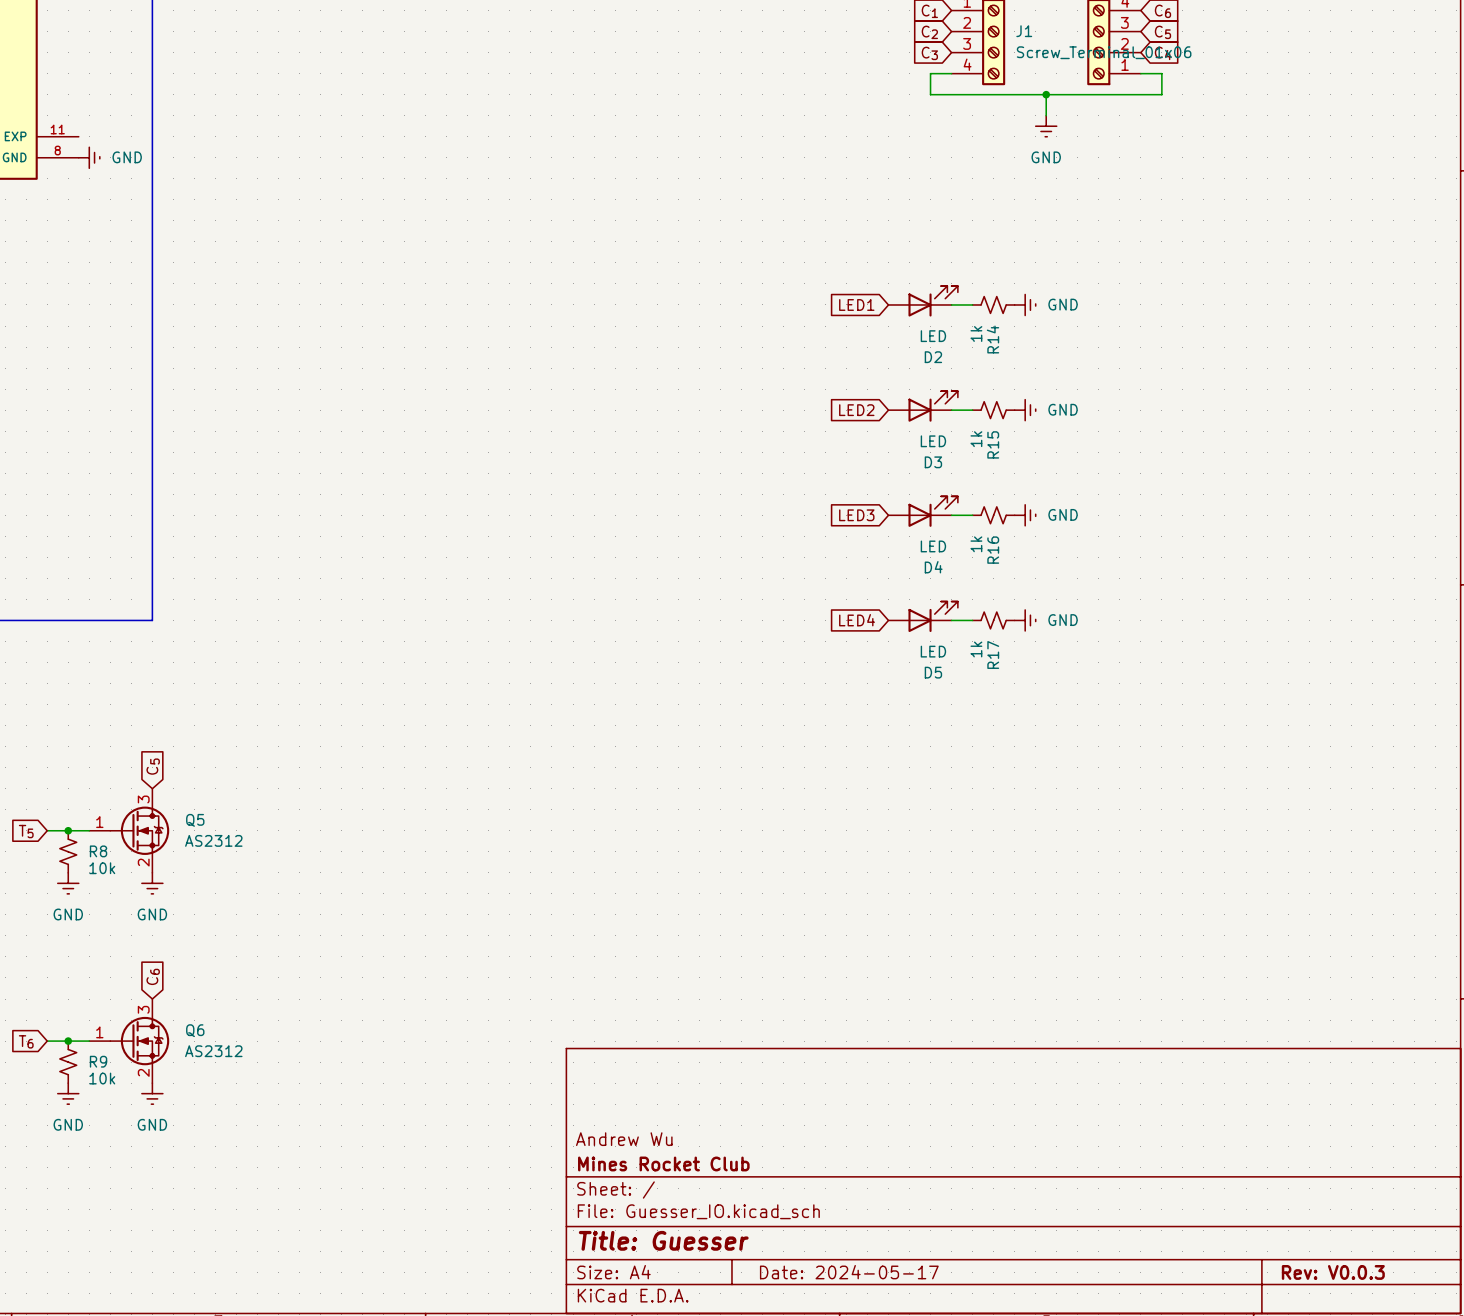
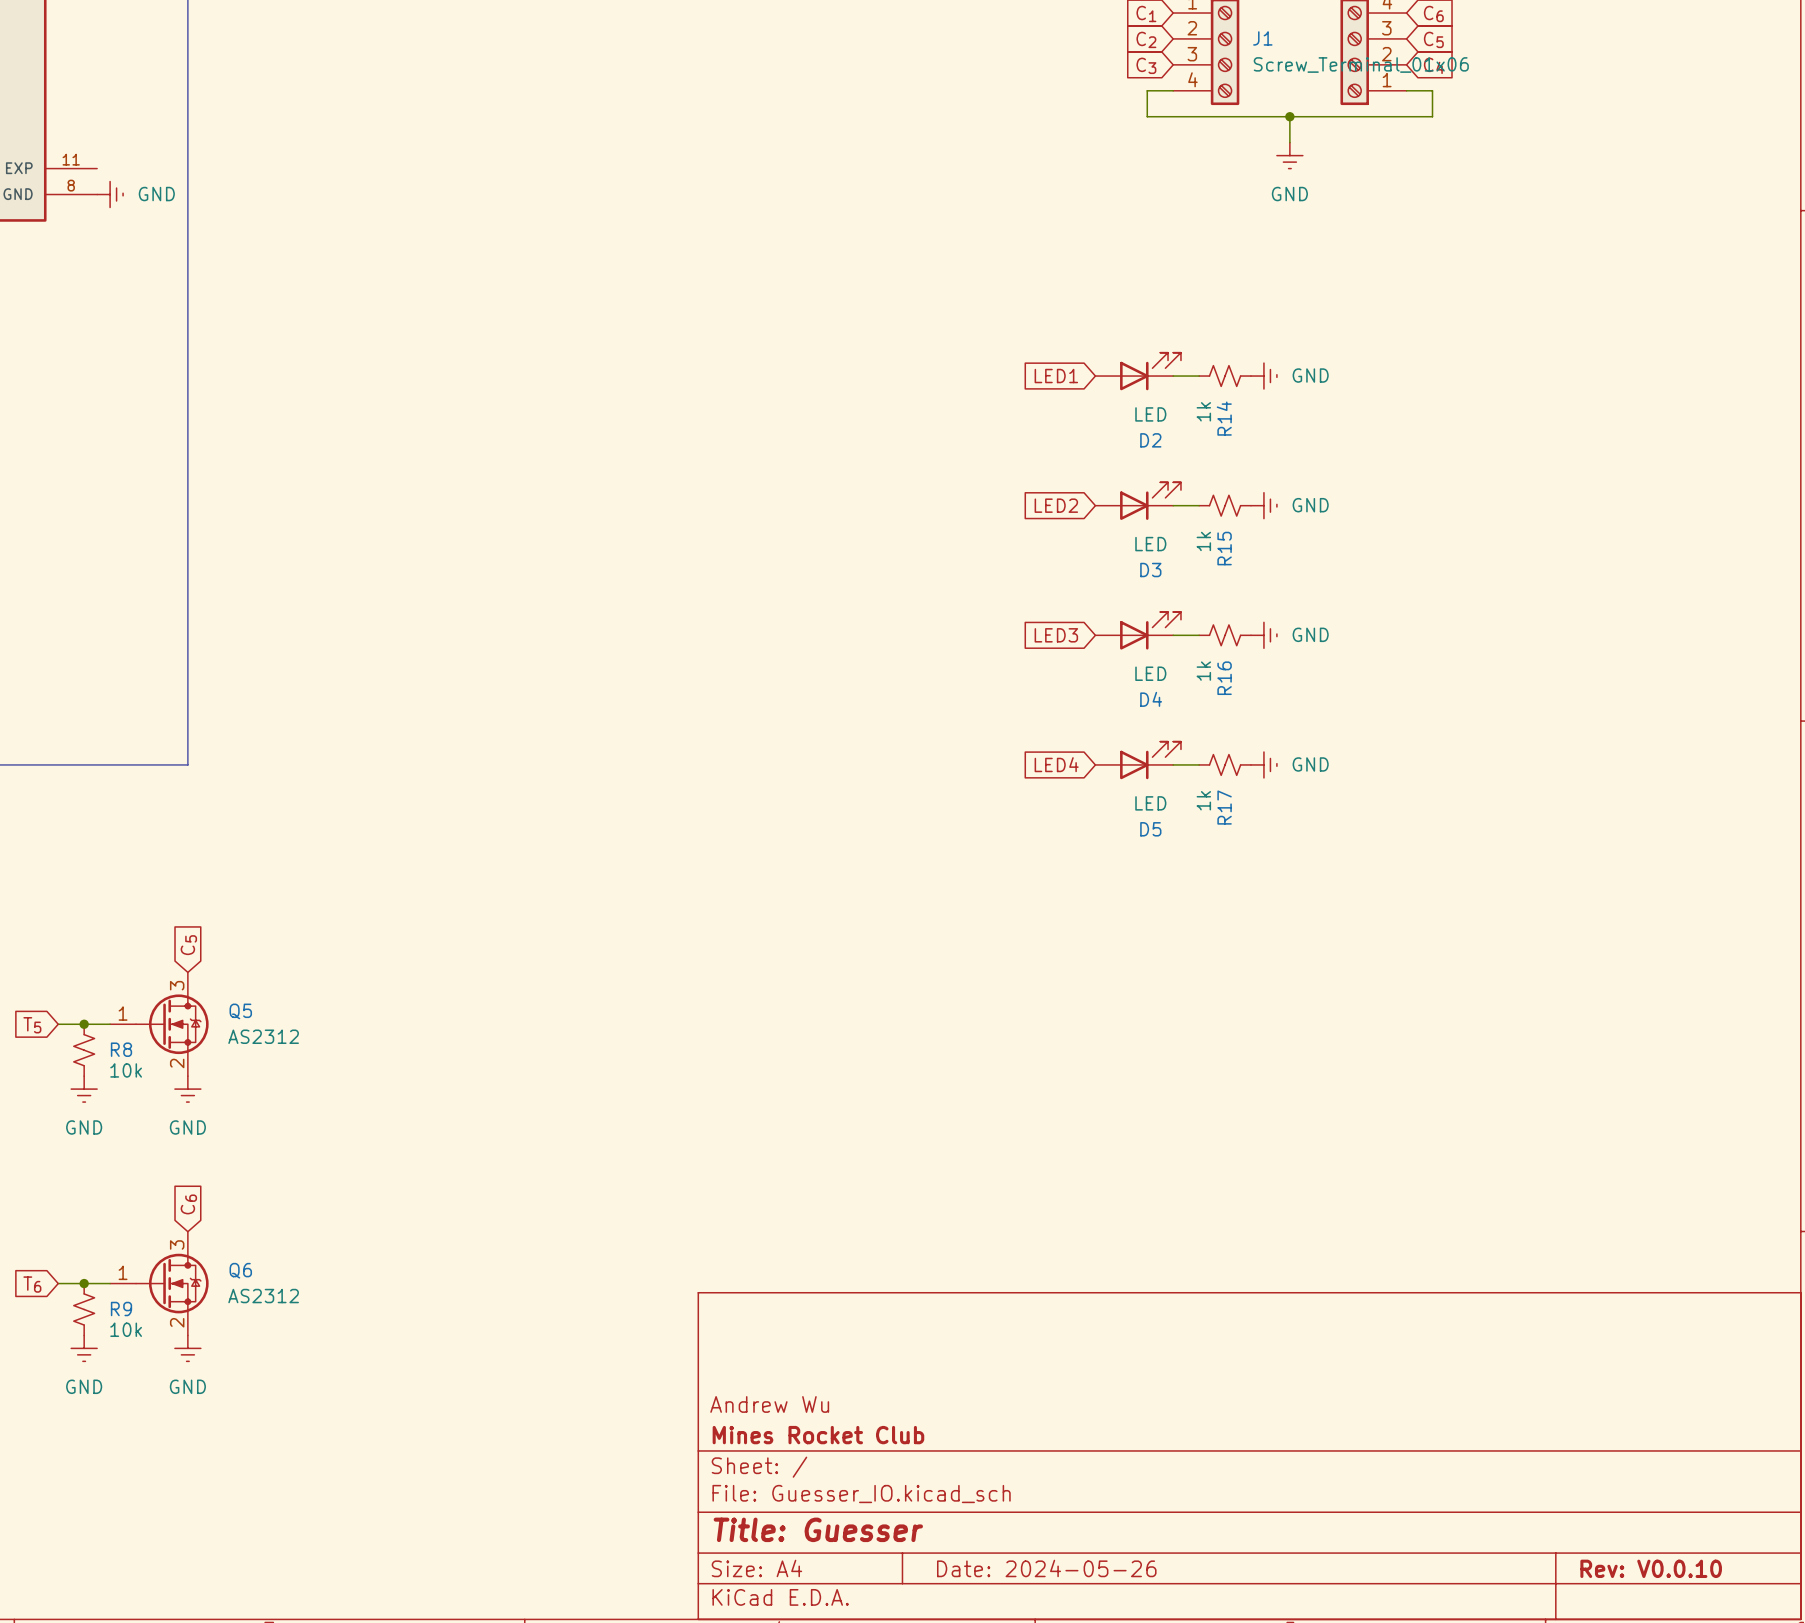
title block: Date: 2024-05-17 (849, 1272) -> Date: 2024-05-26 (1046, 1568)
title block: Rev: V0.0.3 (1333, 1272) -> Rev: V0.0.10 (1651, 1568)

